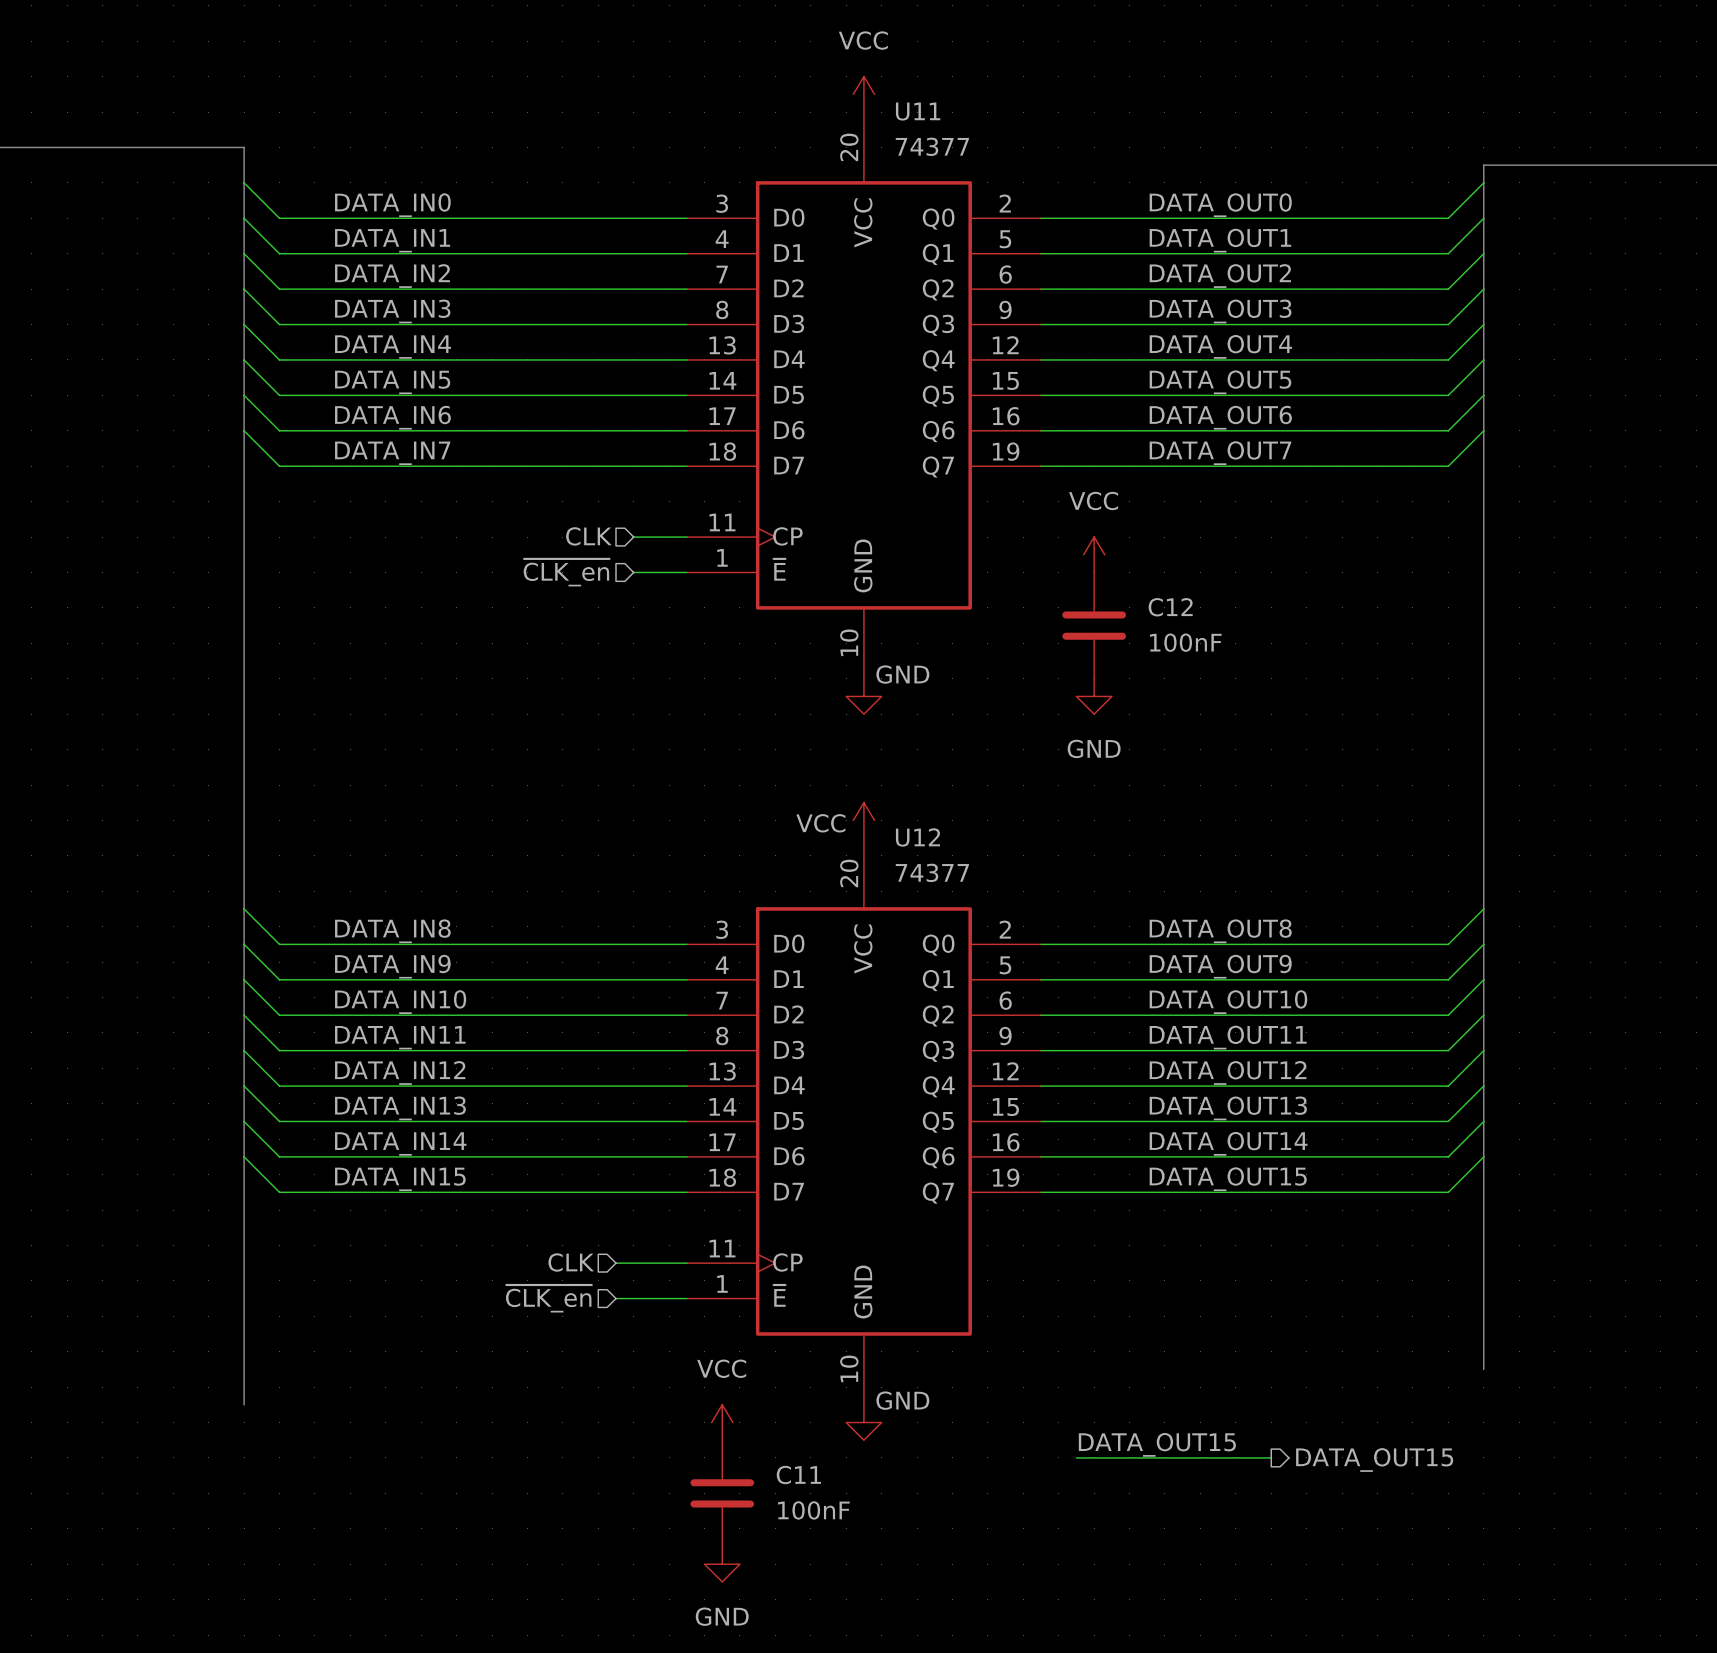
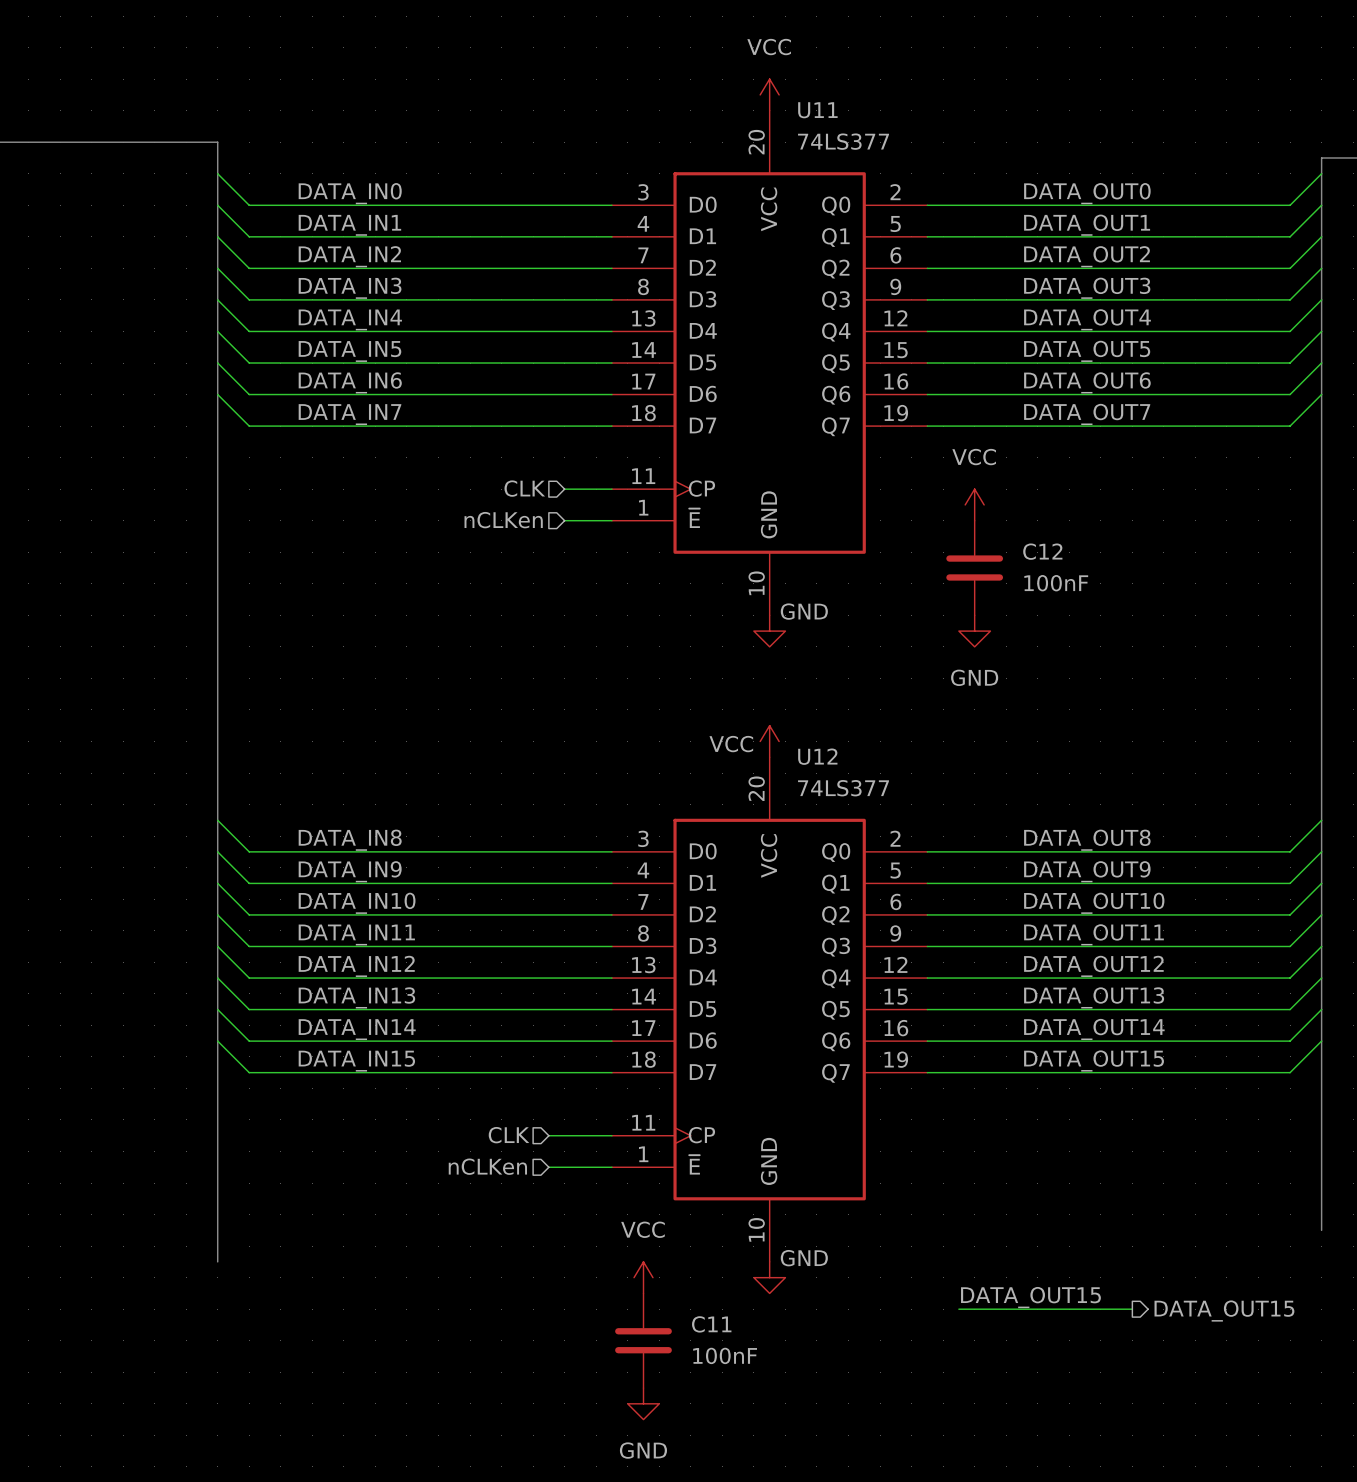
U11 value: 74377 (932, 146) -> 74LS377 (843, 141)
hierarchical label: ~{CLK_en} (566, 572) -> nCLKen (503, 520)
U12 value: 74377 (932, 872) -> 74LS377 (843, 788)
hierarchical label: ~{CLK_en} (548, 1298) -> nCLKen (487, 1166)

